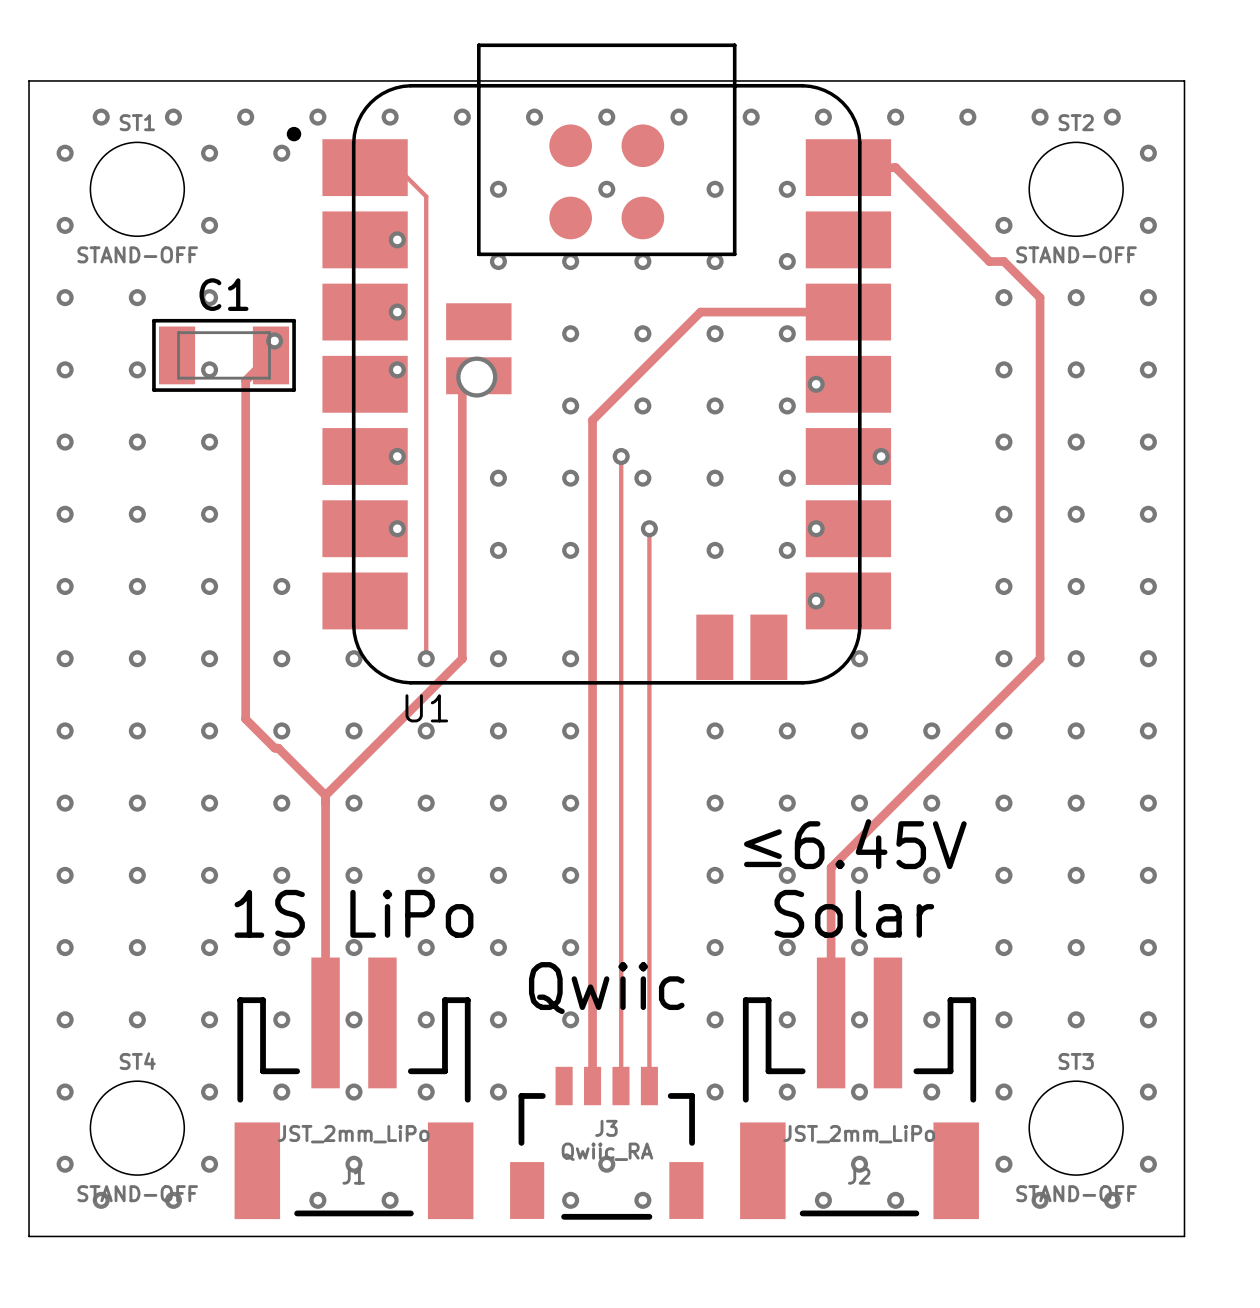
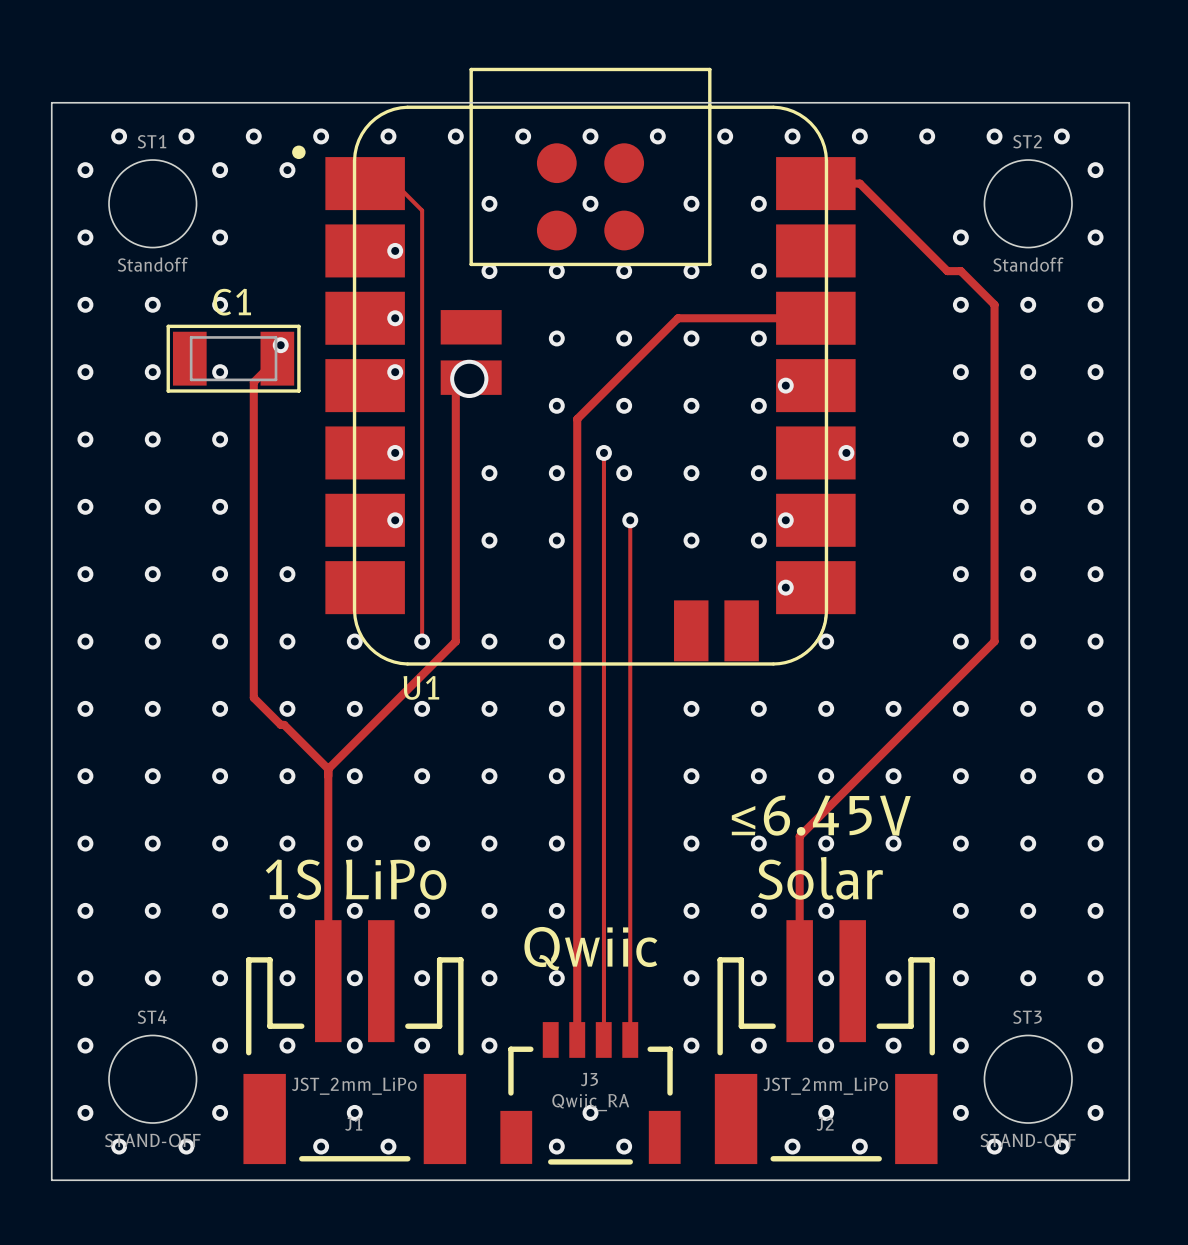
ST1 value: STAND-OFF (137, 254) -> Standoff (153, 264)
ST2 value: STAND-OFF (1076, 254) -> Standoff (1028, 264)

